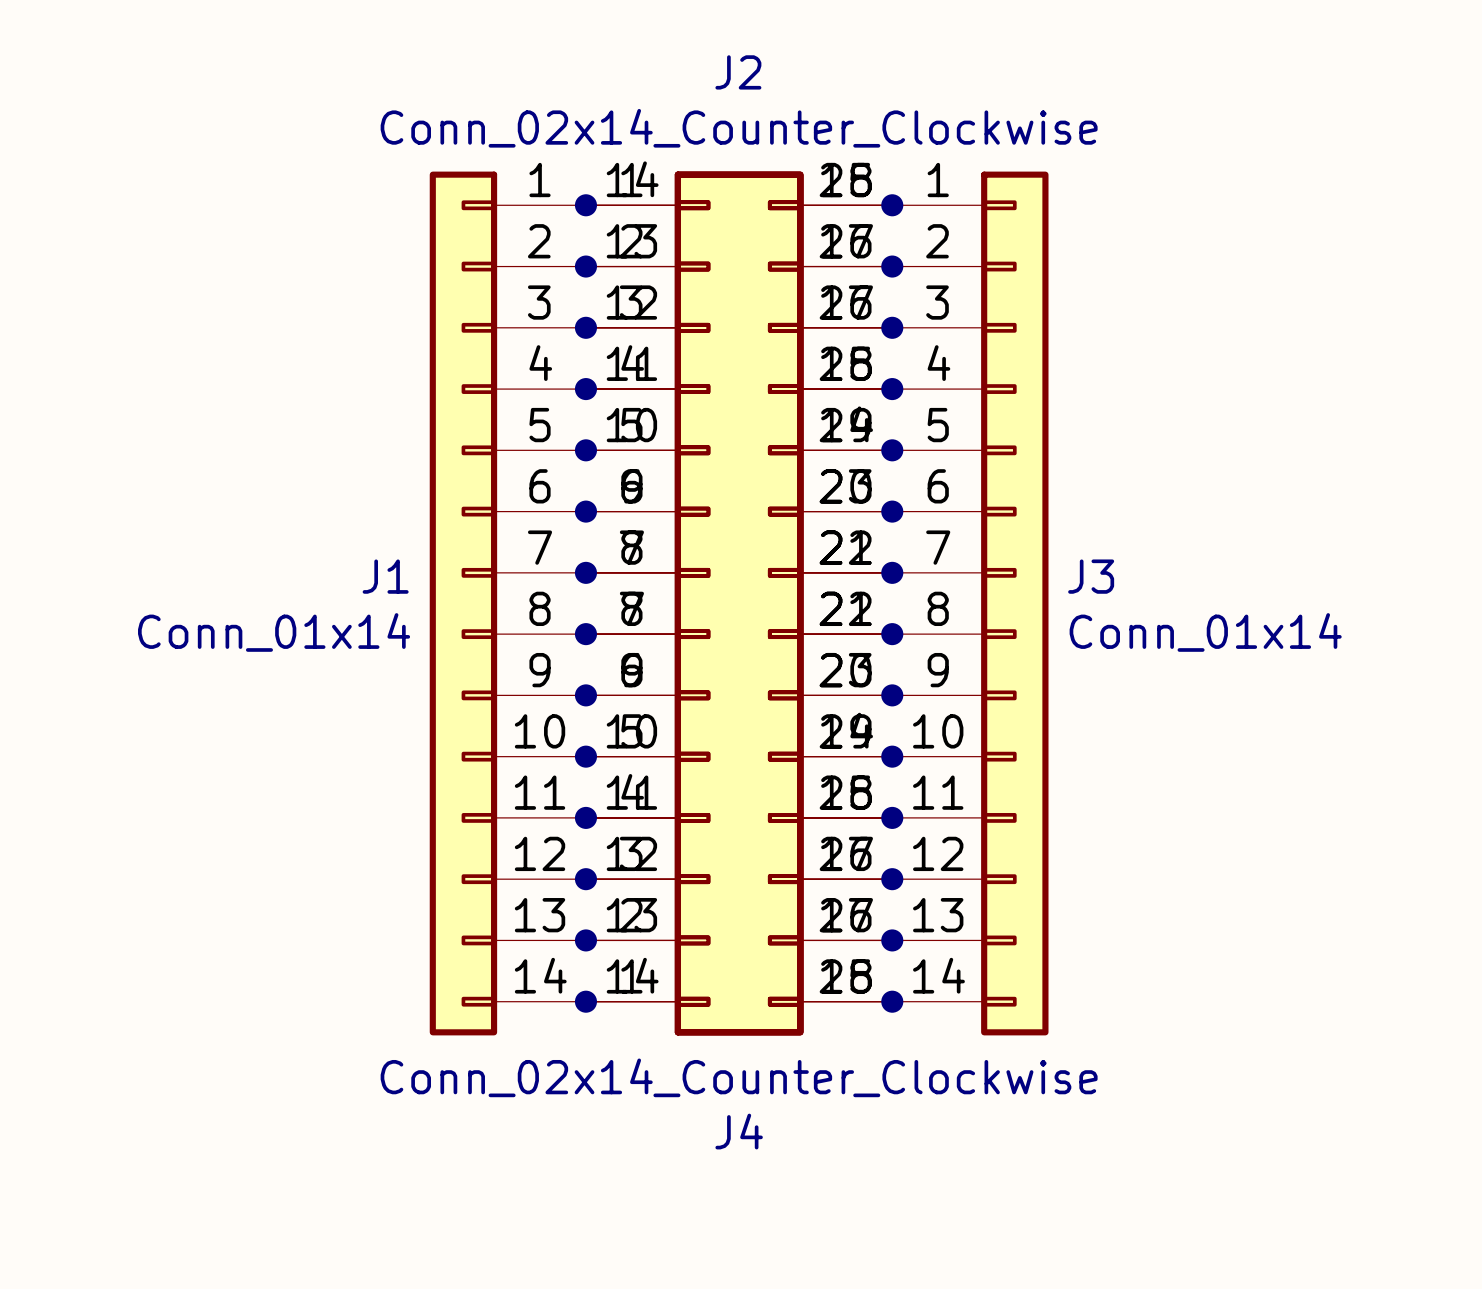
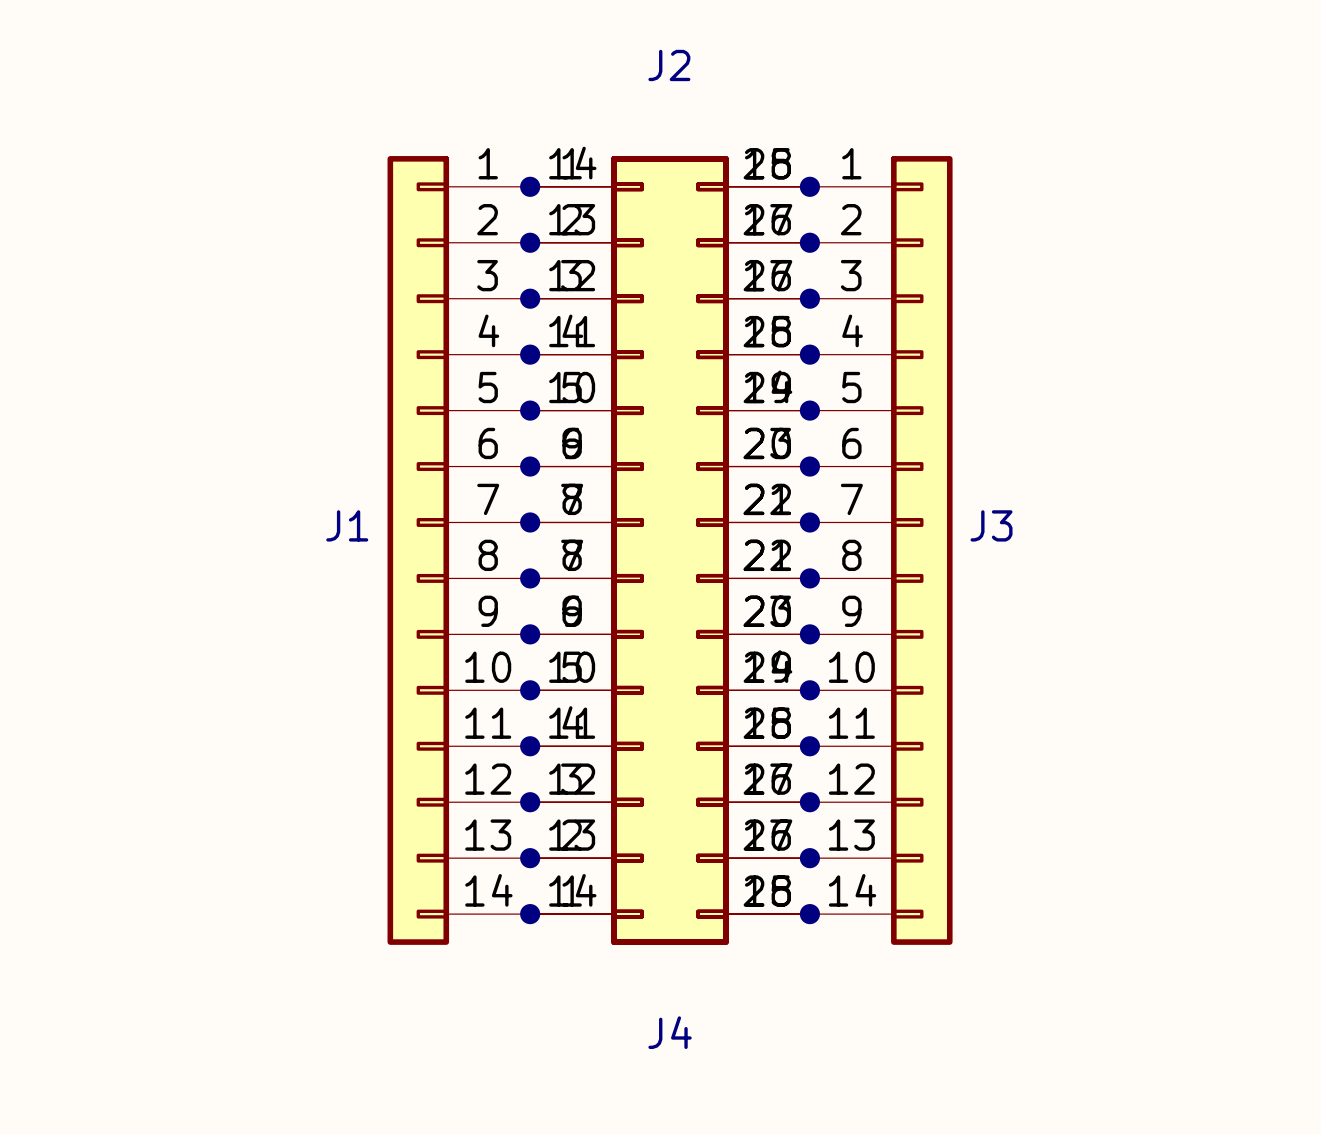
J2 value: Conn_02x14_Counter_Clockwise (739, 128) -> none
J1 value: Conn_01x14 (274, 632) -> none
J3 value: Conn_01x14 (1205, 632) -> none
J4 value: Conn_02x14_Counter_Clockwise (739, 1077) -> none

